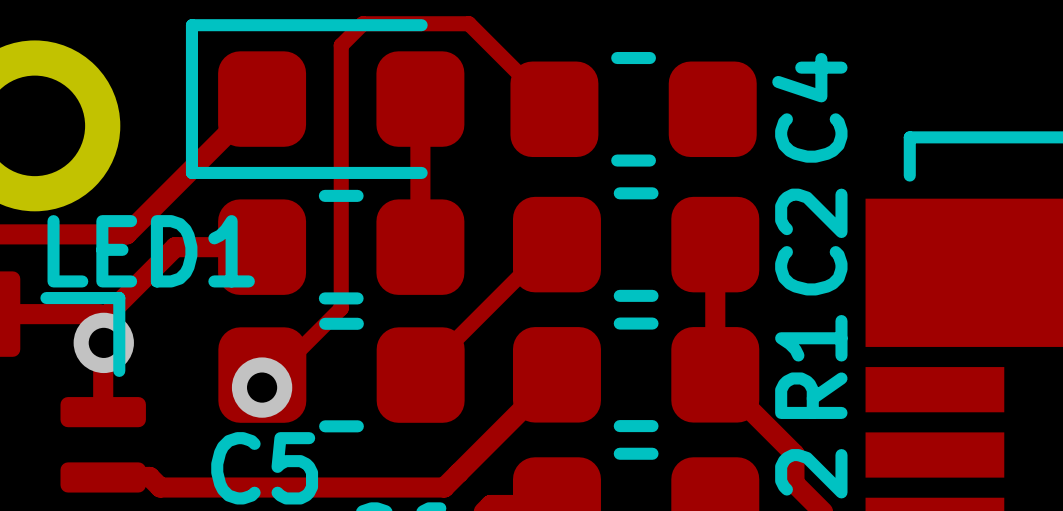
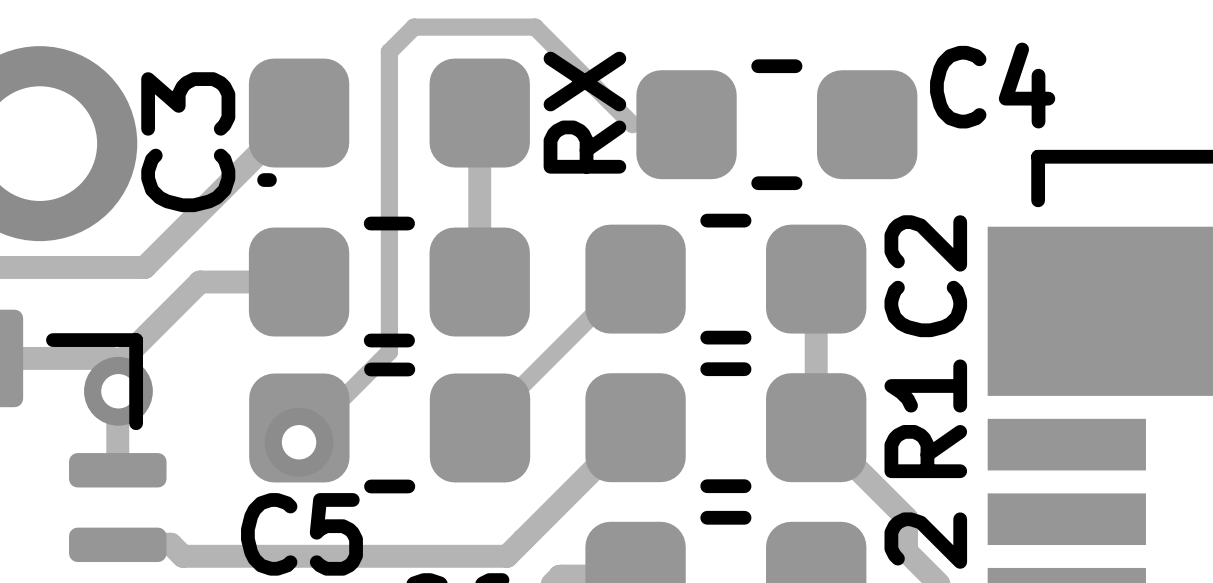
LED1: (325, 99) -> none
RX: none -> (389, 122)
C4 name rotation: 0° (809, 107) -> 90° clockwise (992, 85)
C4 position: (633, 109) -> (776, 124)
text: none -> C3 (188, 142)

